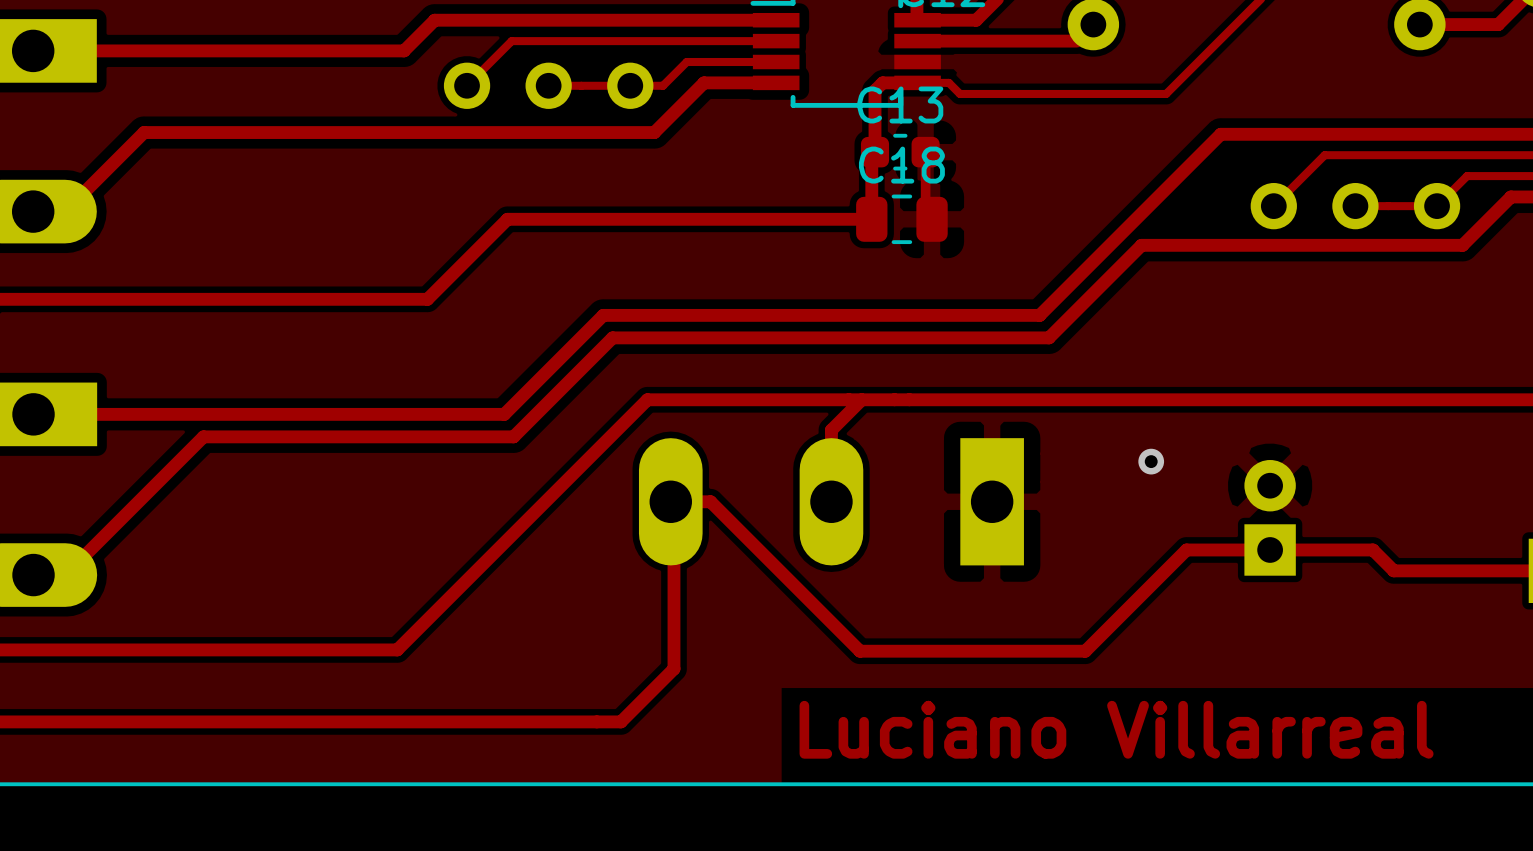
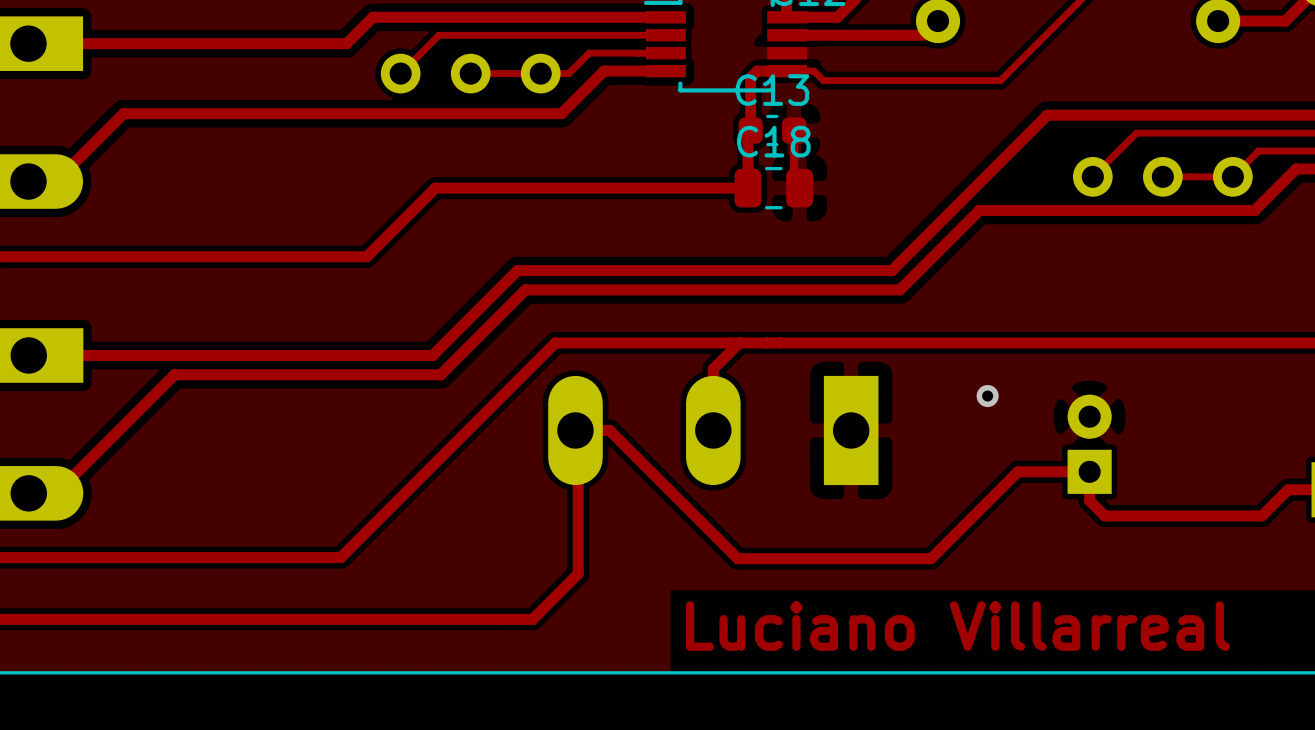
track: (1270, 549) (1372, 549) (1393, 570) (1501, 570) -> (1089, 471) (1089, 500) (1104, 515) (1261, 515) (1288, 489)

